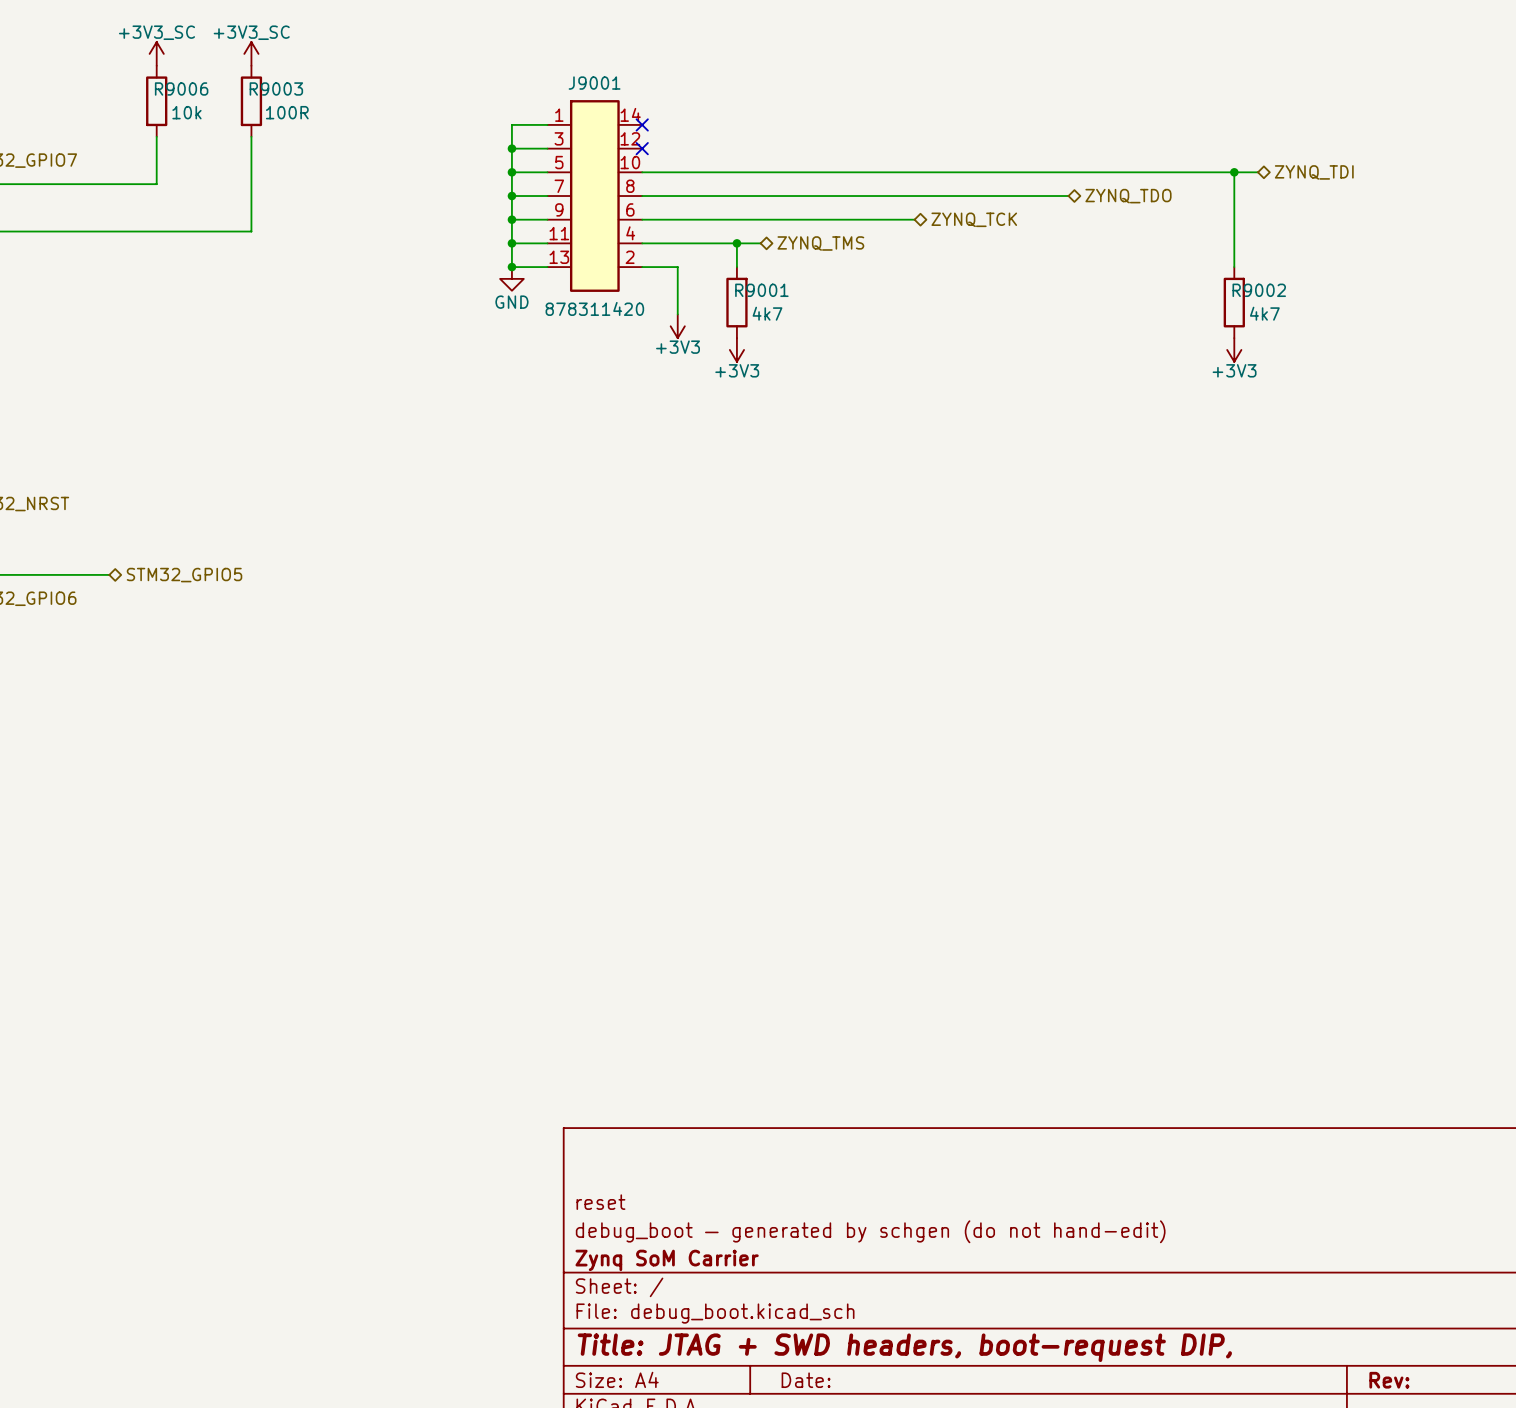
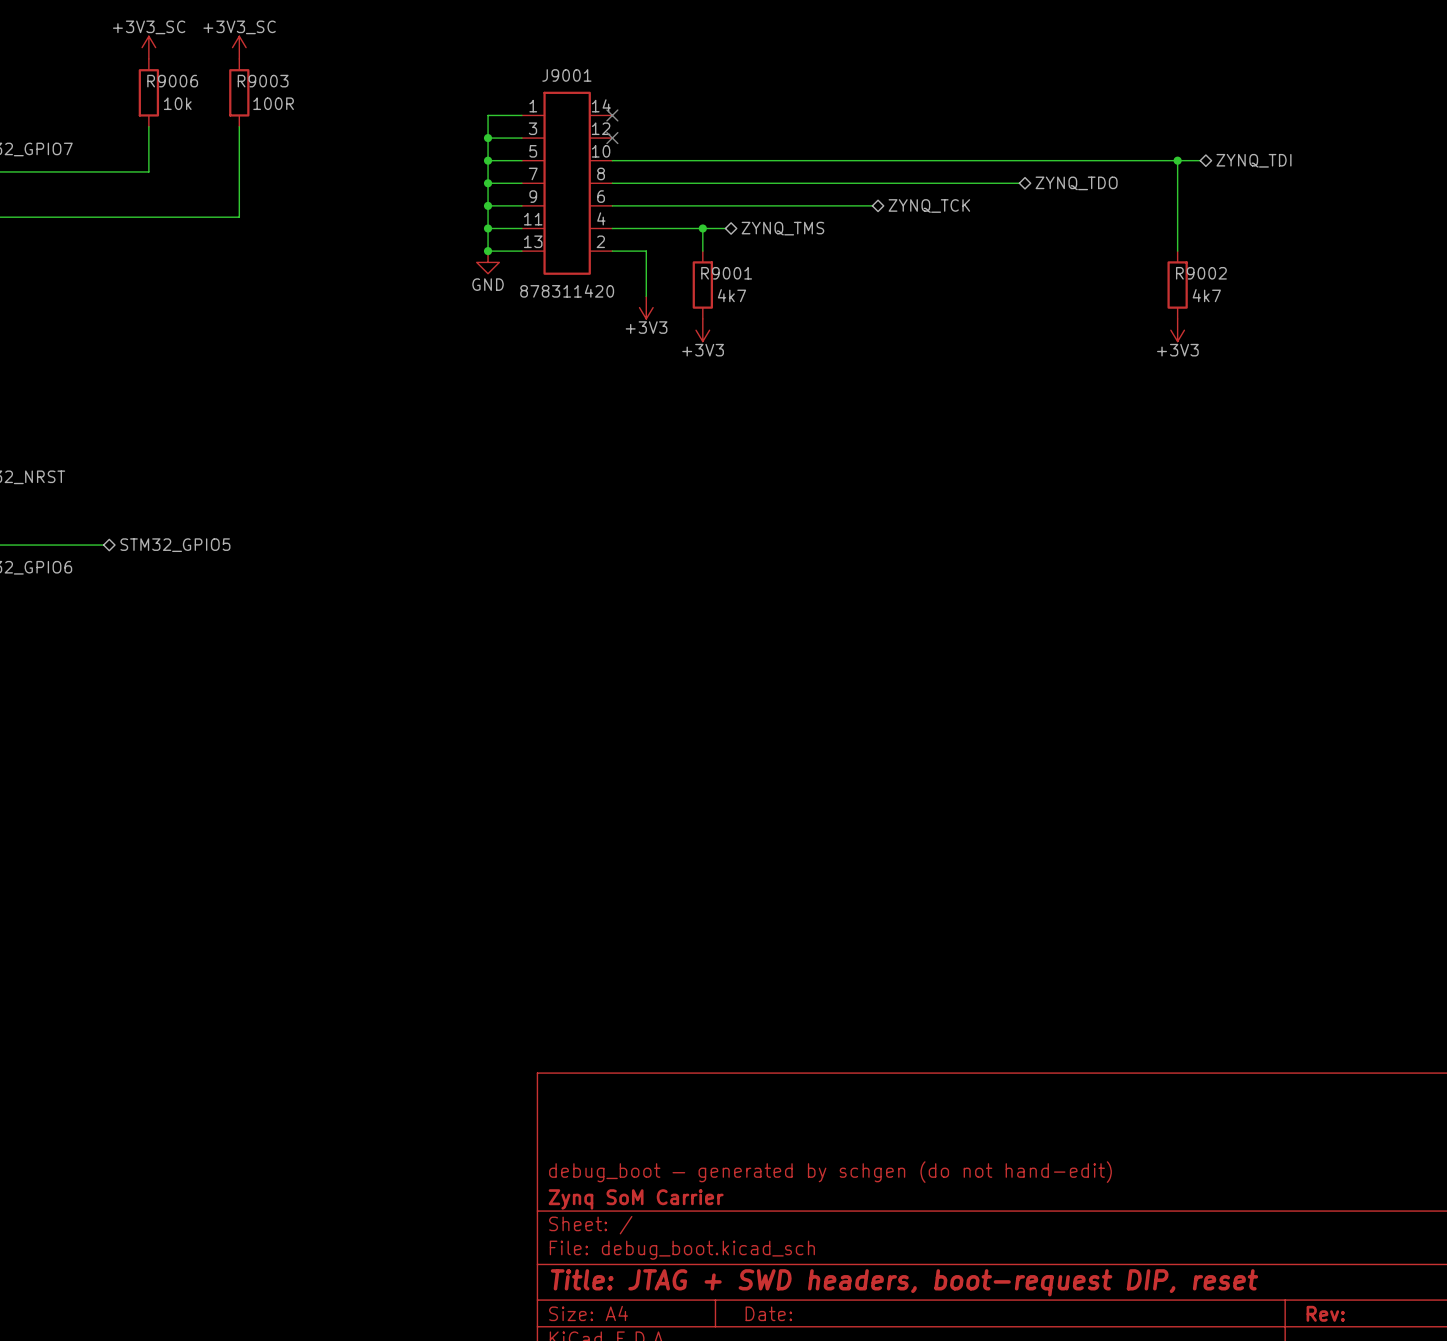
title block: reset (600, 1202) -> none
title block: Title: JTAG + SWD headers, boot-request DIP, (904, 1347) -> Title: JTAG + SWD headers, boot-request DIP, reset (904, 1282)

